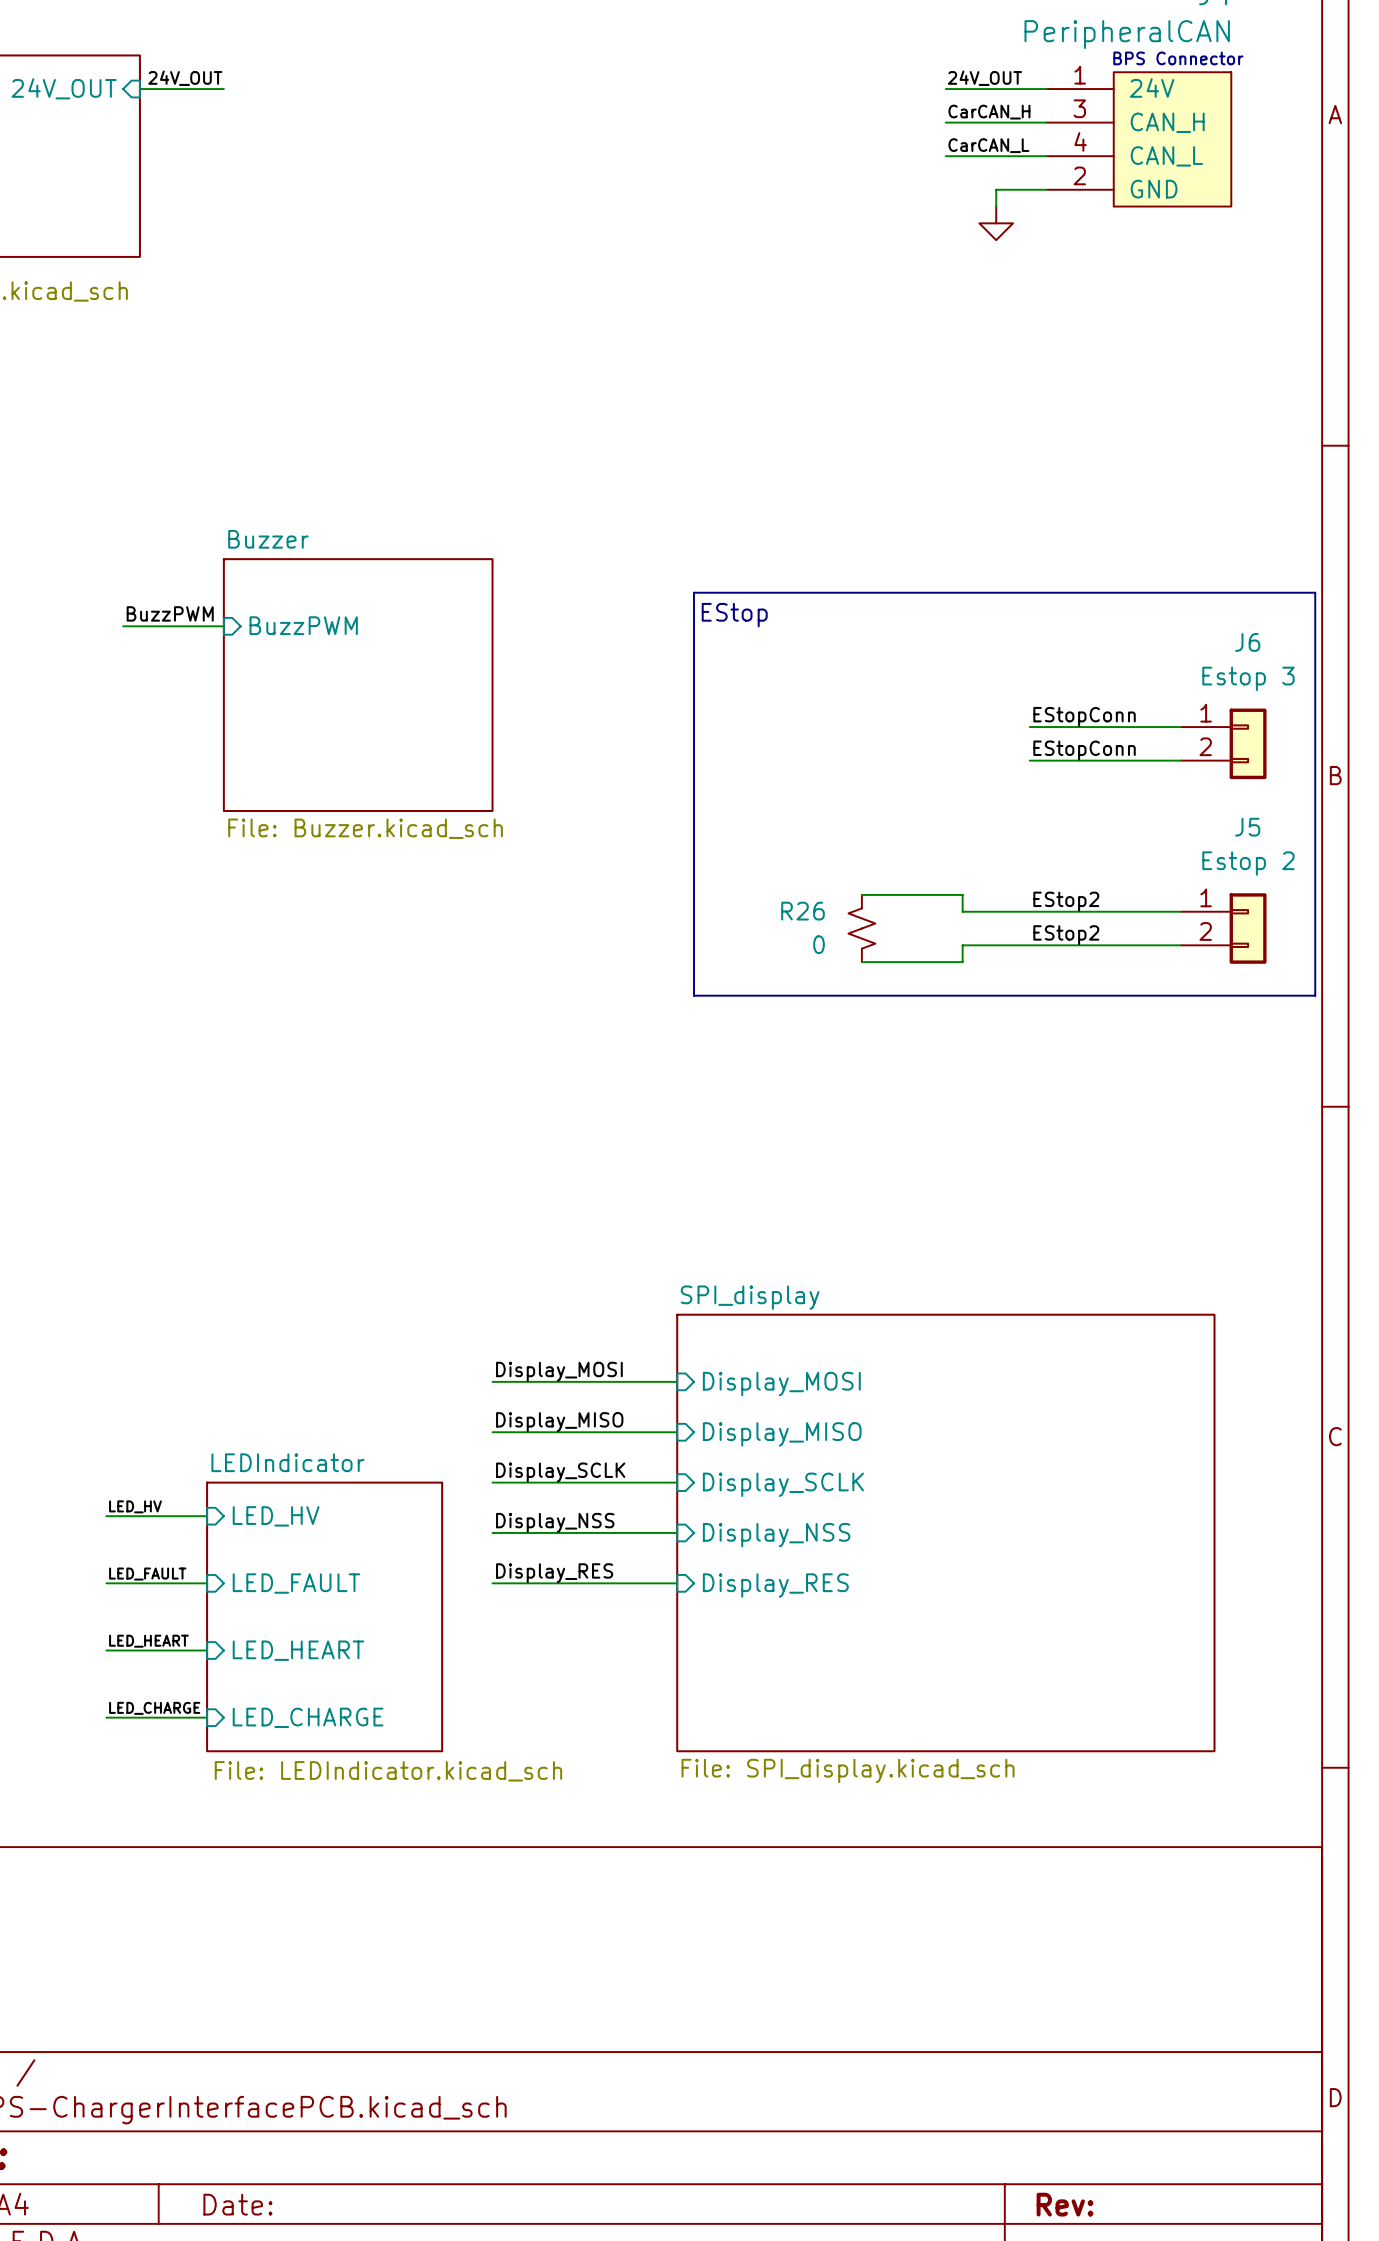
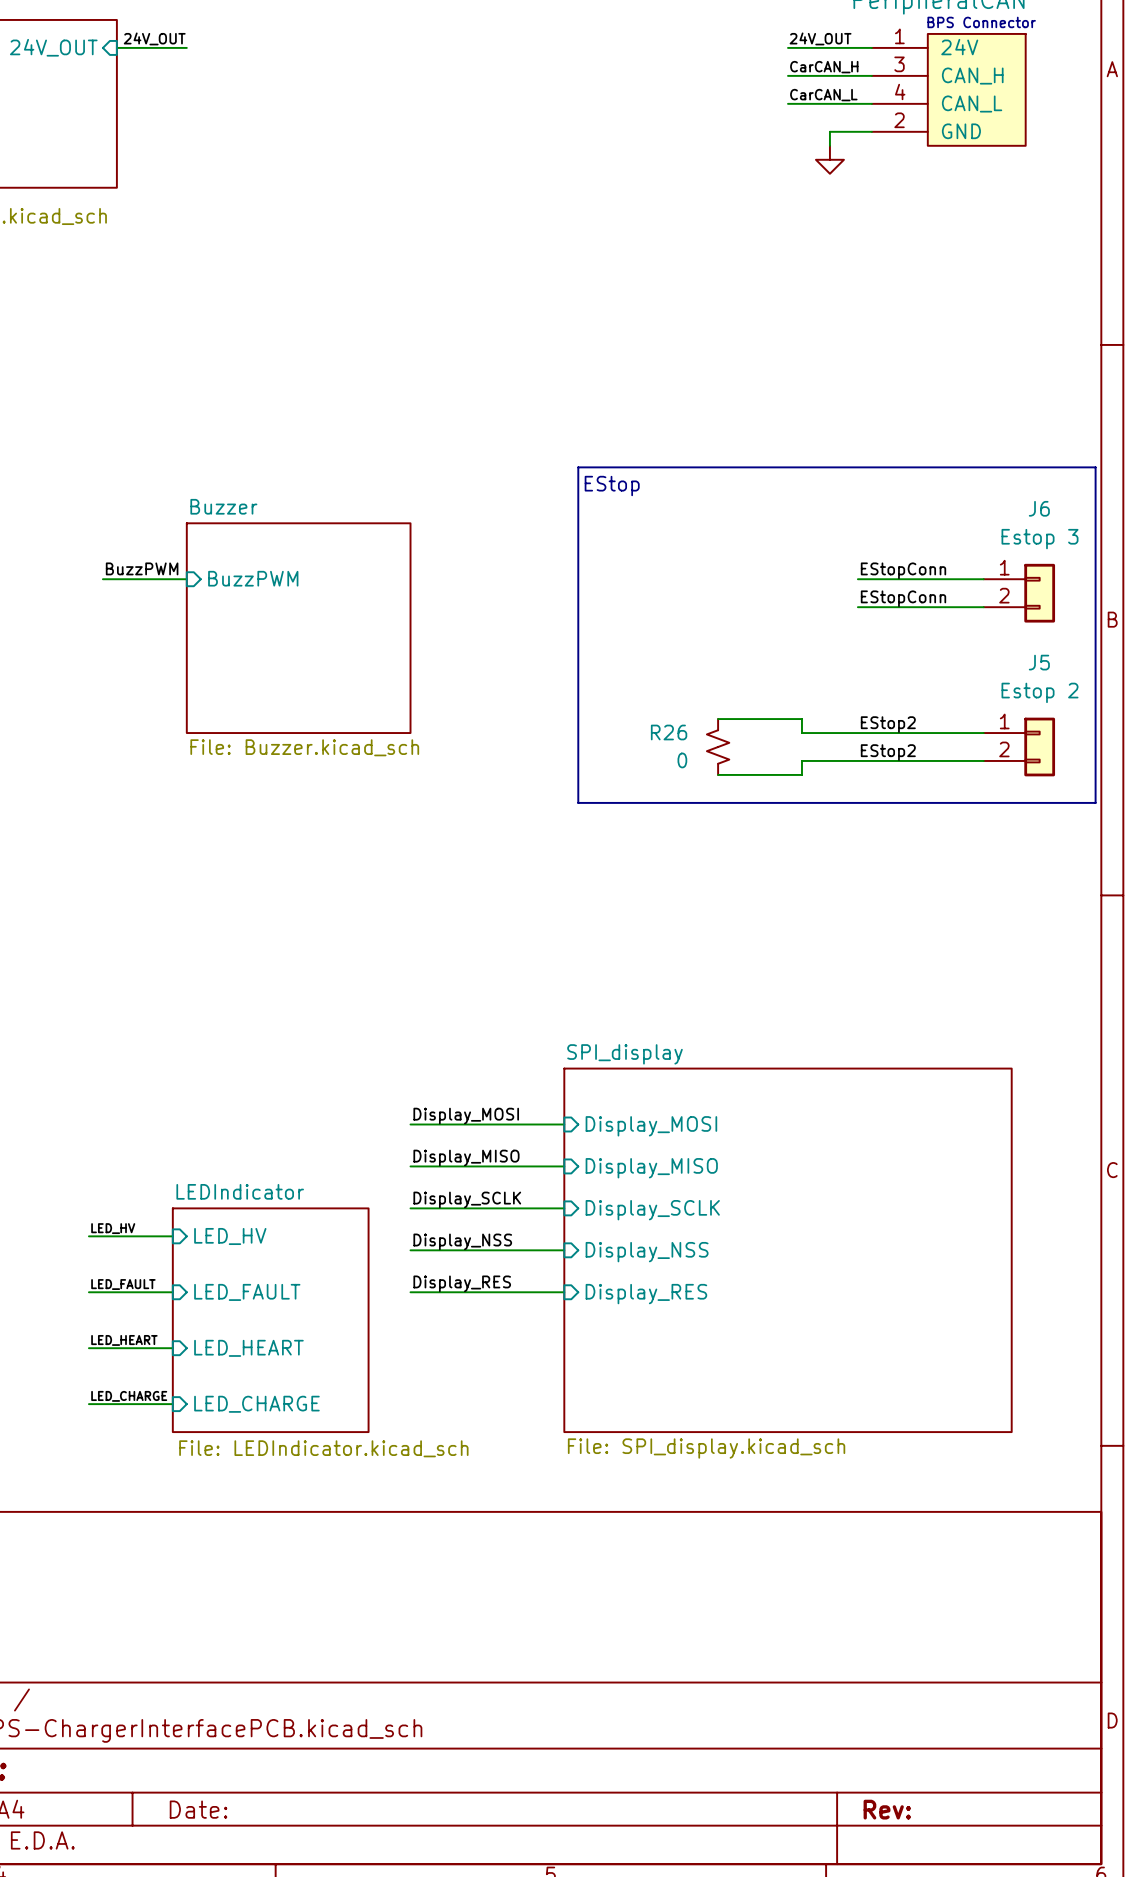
label position: BuzzPWM (170, 613) -> BuzzPWM (142, 568)
sheet pin position: BuzzPWM (303, 625) -> BuzzPWM (253, 578)
wire: (123, 626) (223, 626) -> (102, 579) (186, 579)
sheet Buzzer position: (358, 685) -> (298, 628)

